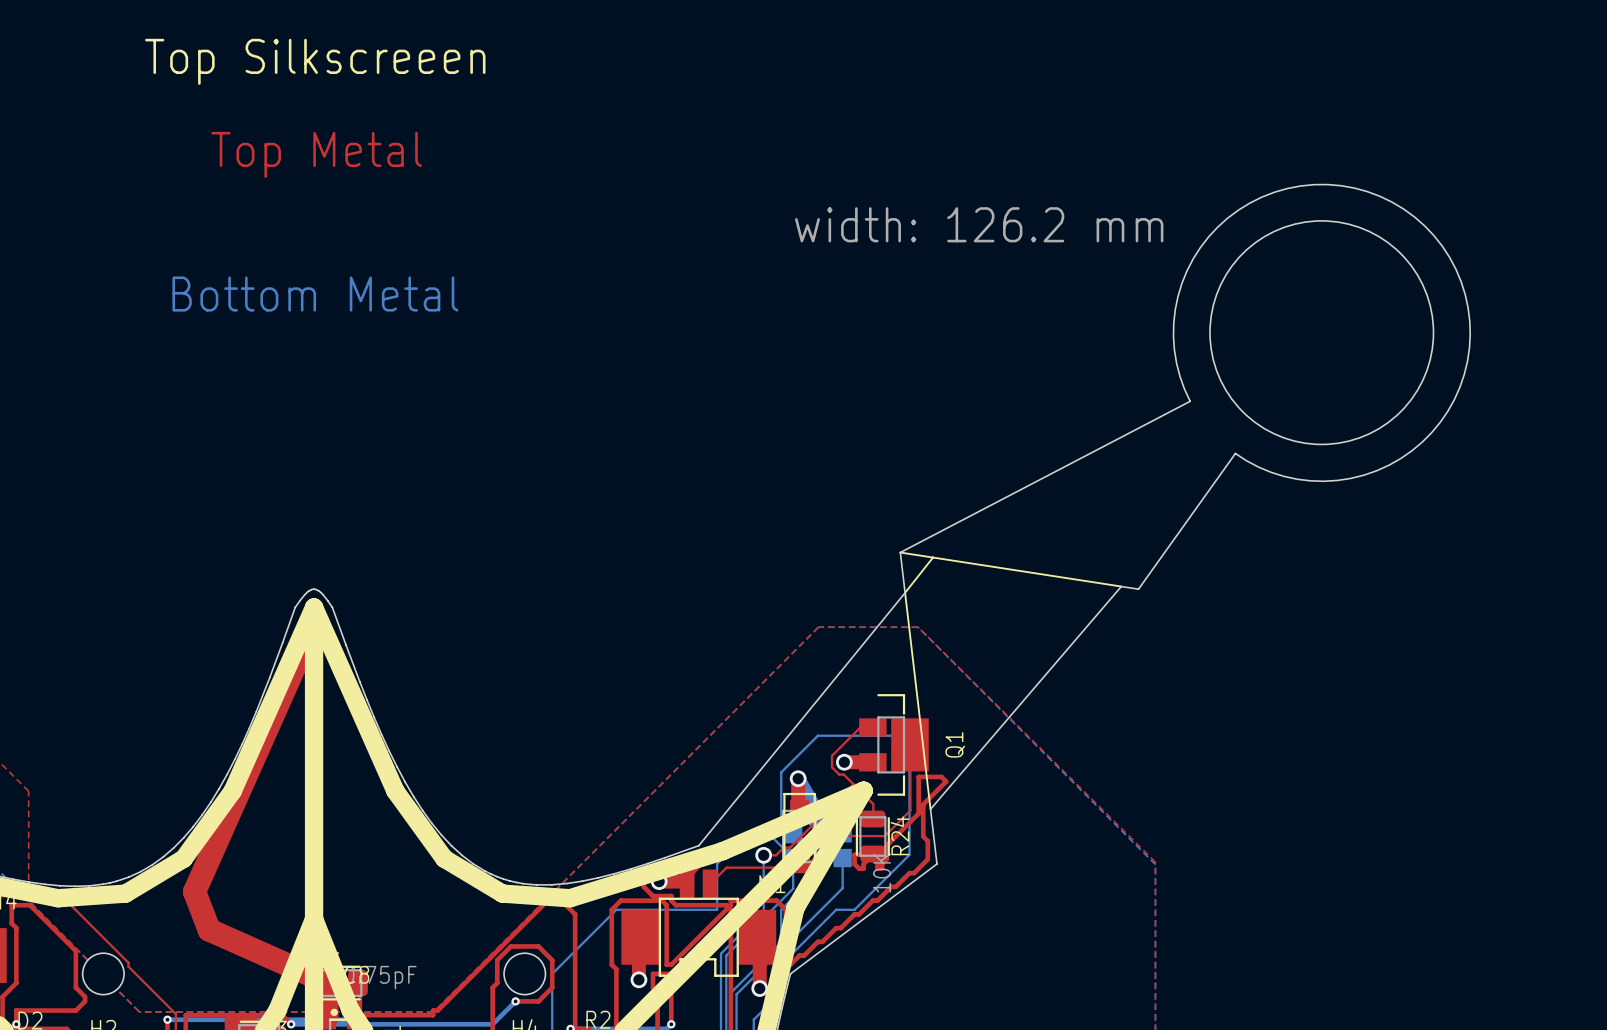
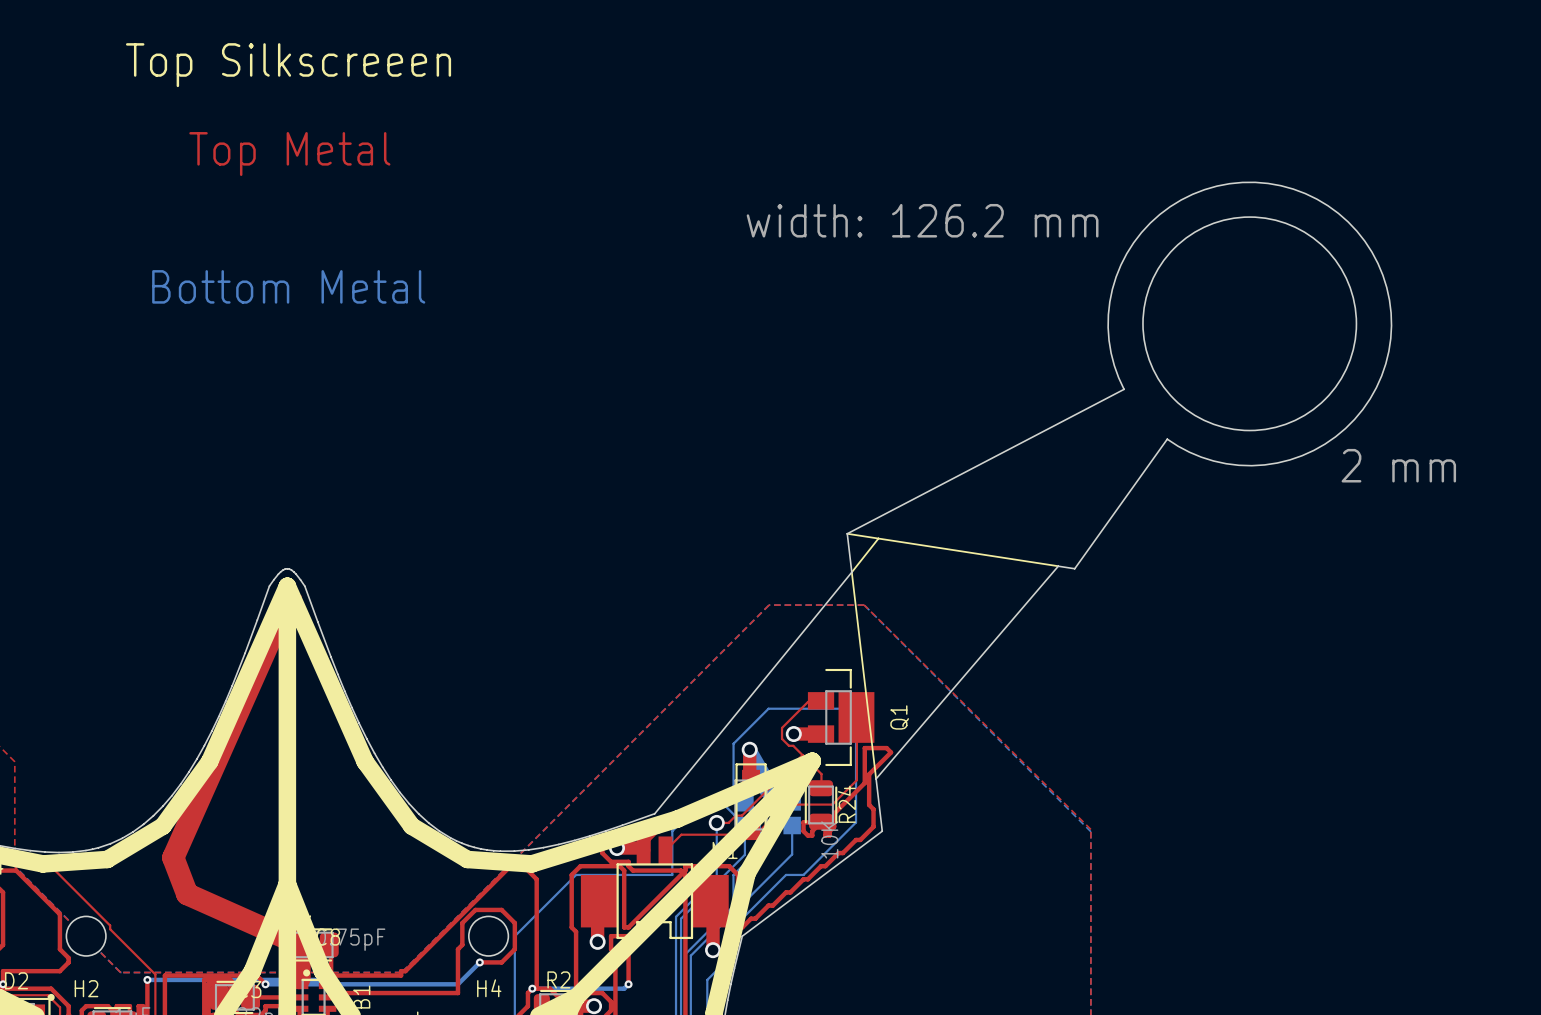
text: none -> 2 mm (1398, 465)

